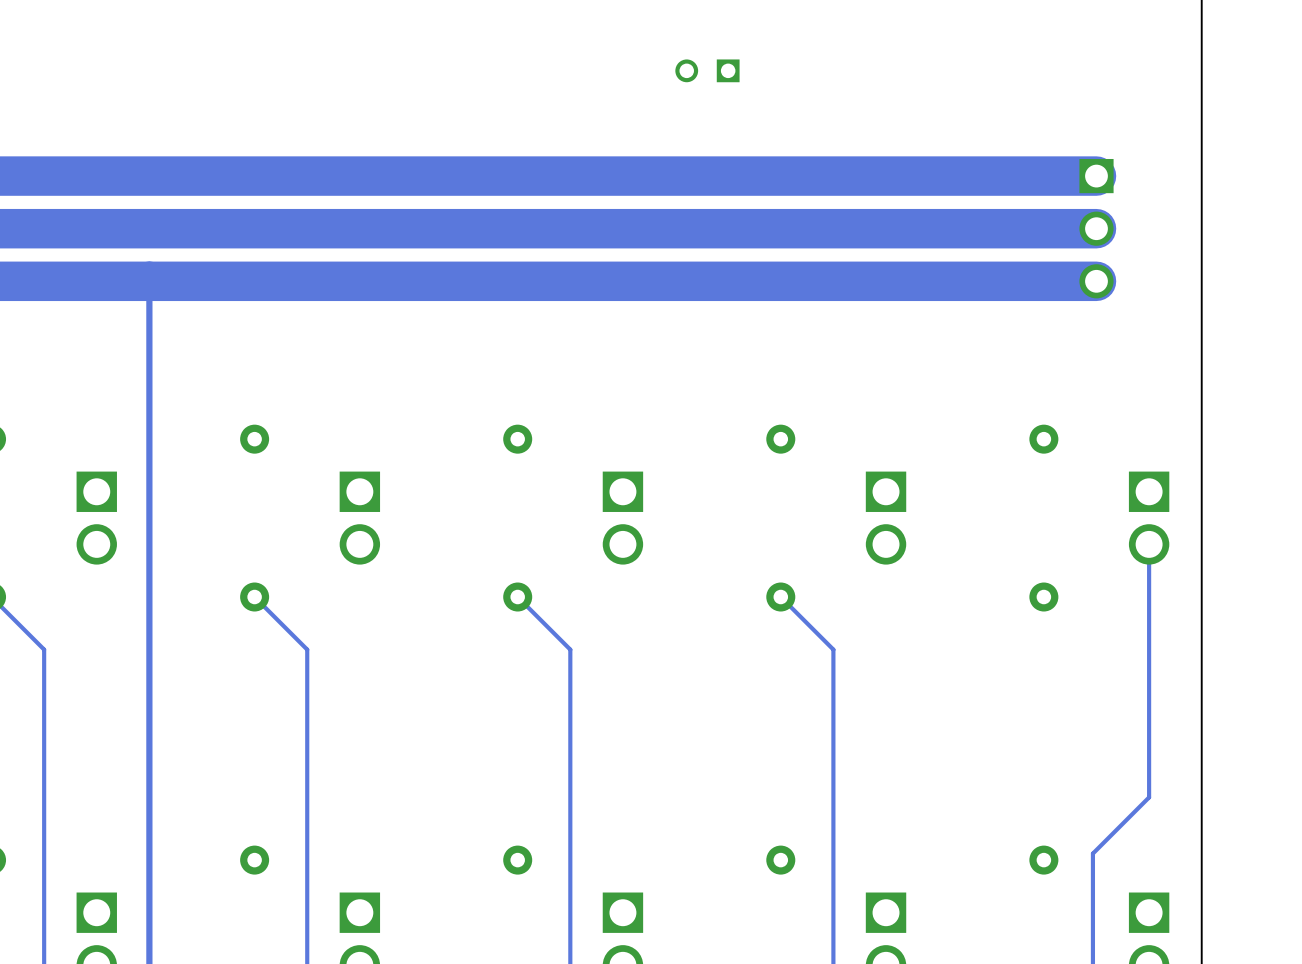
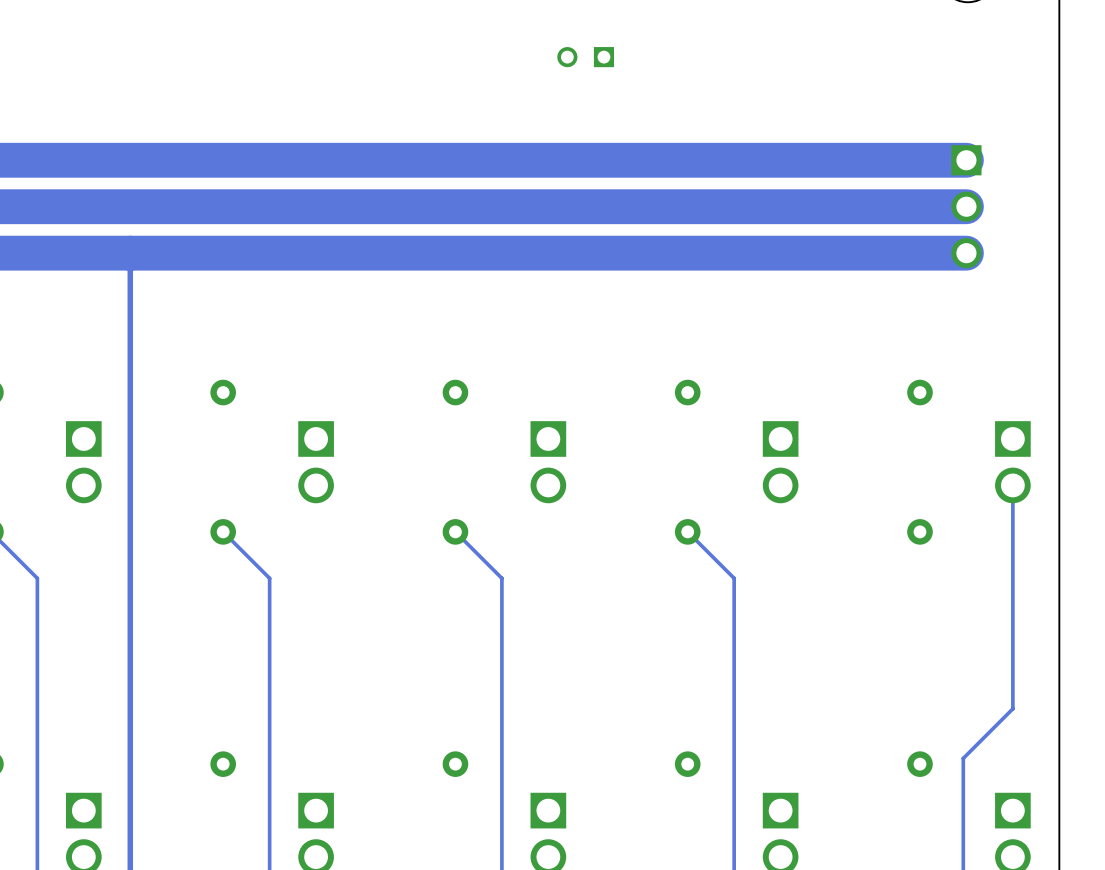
part position: (707, 70) -> (585, 57)

